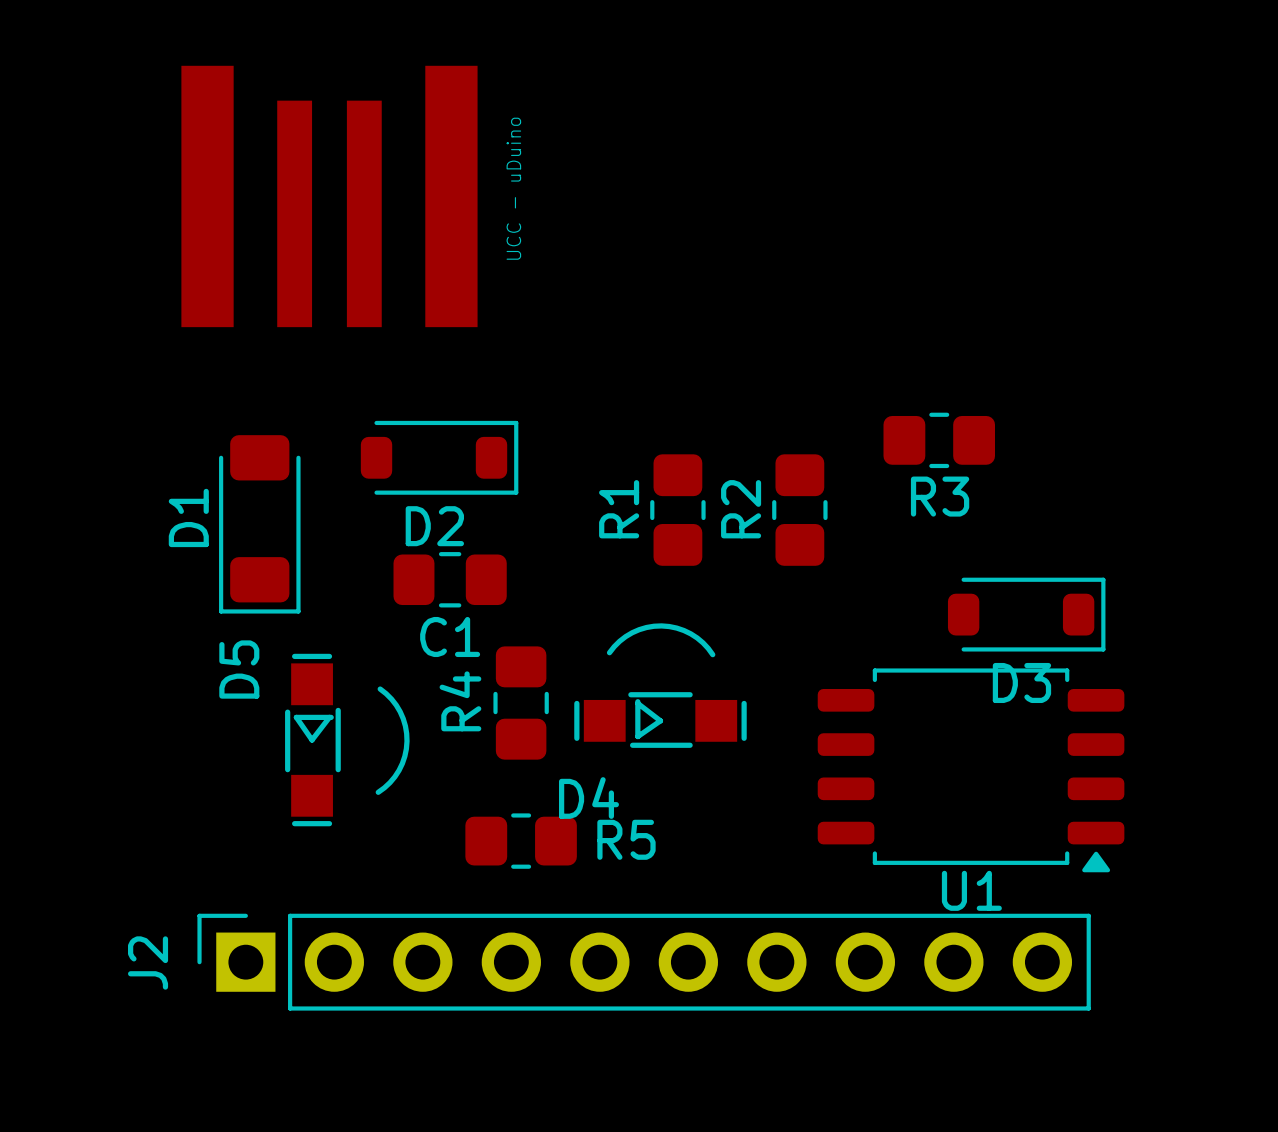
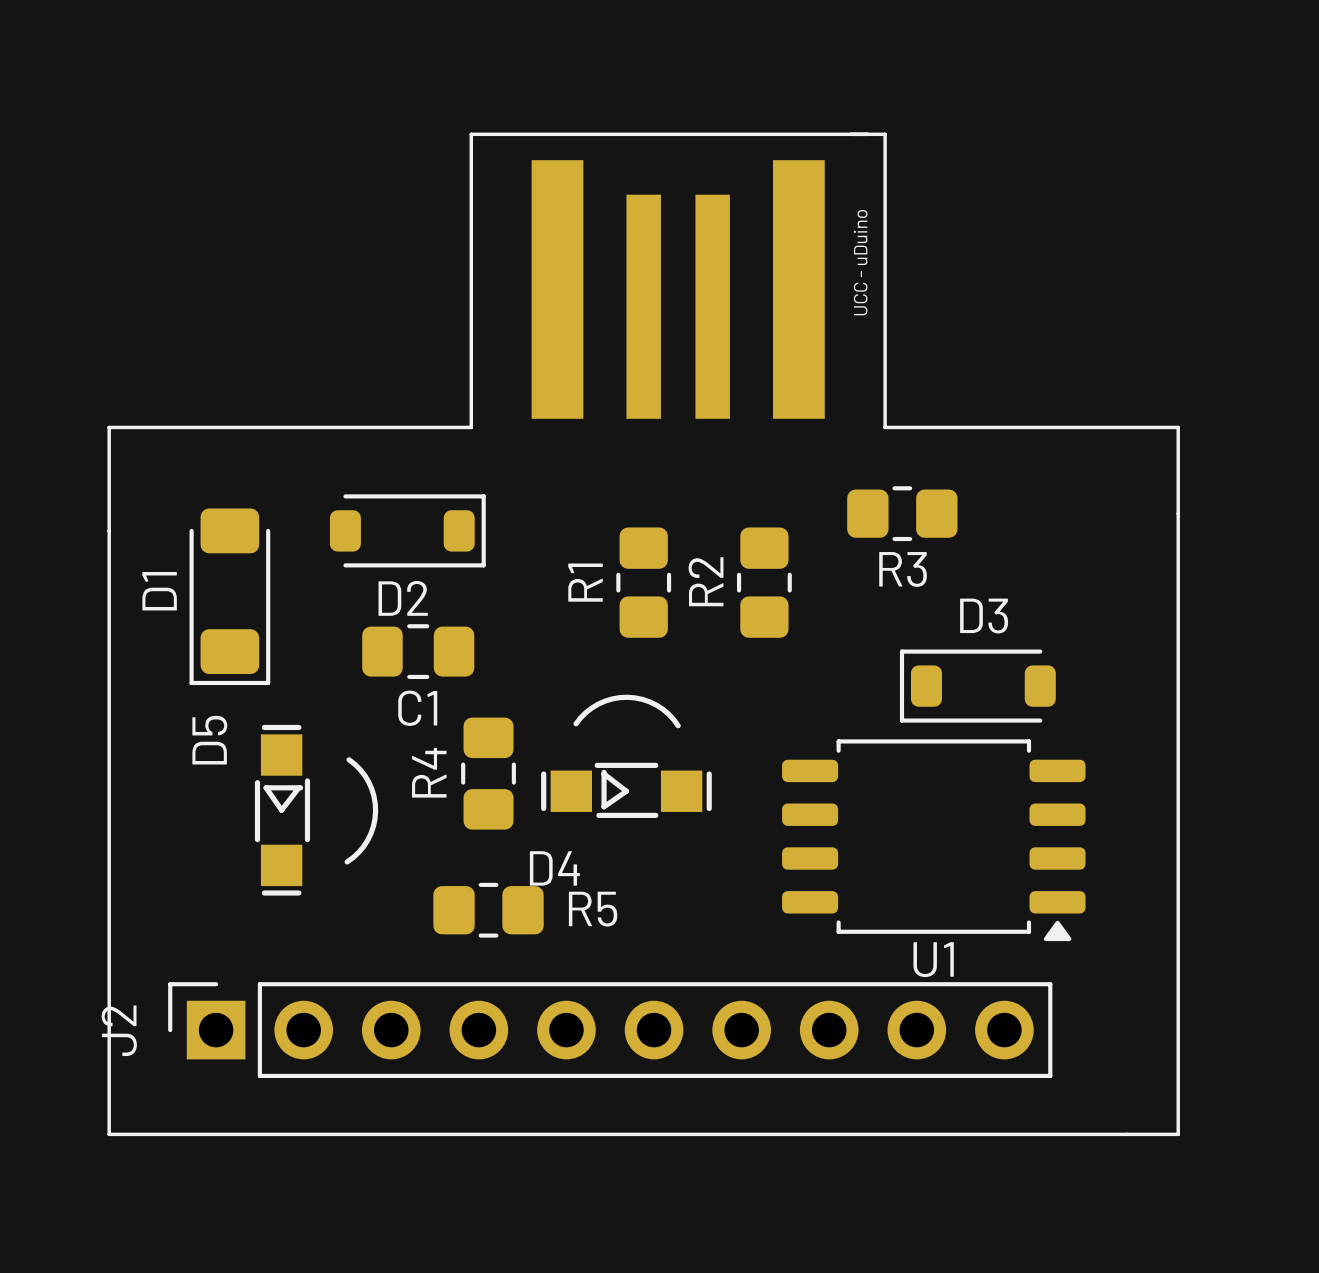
line: none -> (471, 134) (885, 134) (885, 427) (1178, 427) (1178, 1134) (109, 1134) (109, 427) (471, 427) (471, 134)
part position: (329, 196) -> (678, 289)
D3 rotation: 0° (1026, 614) -> 180° (977, 686)

